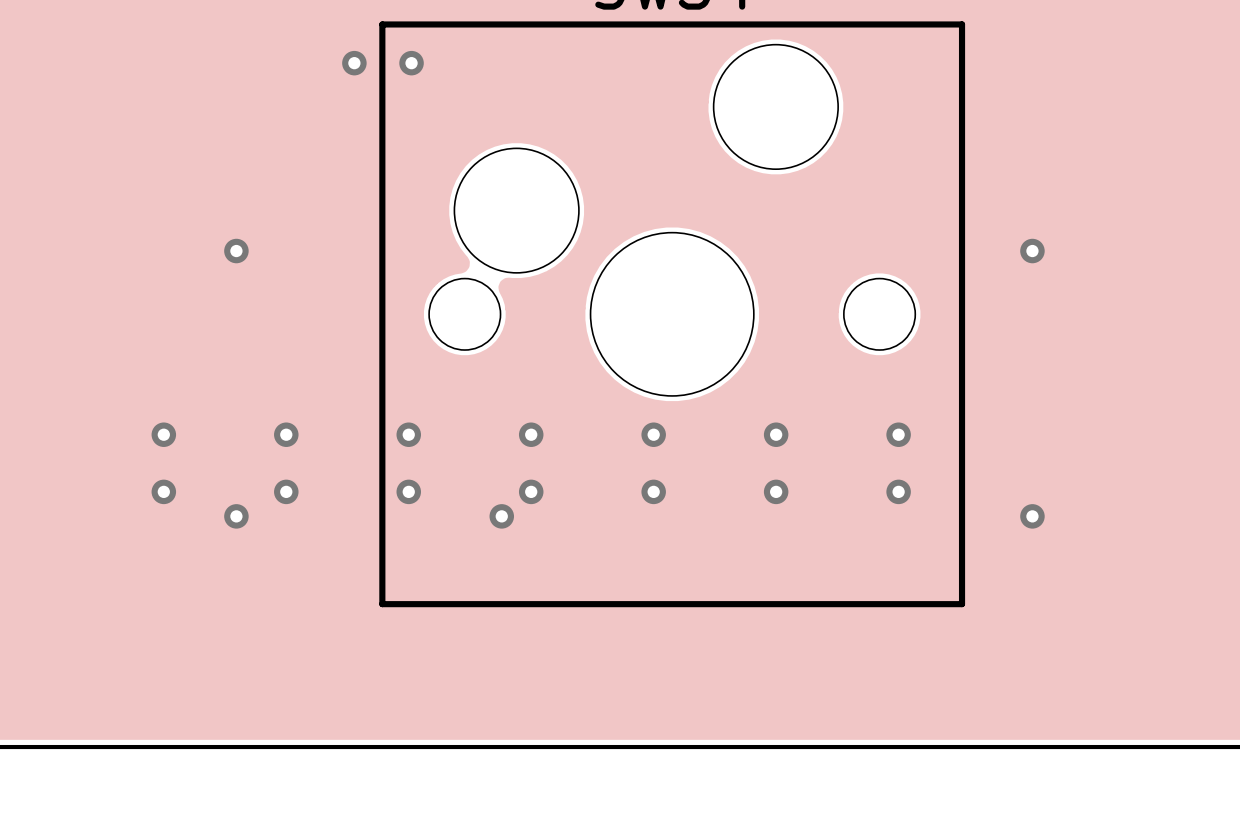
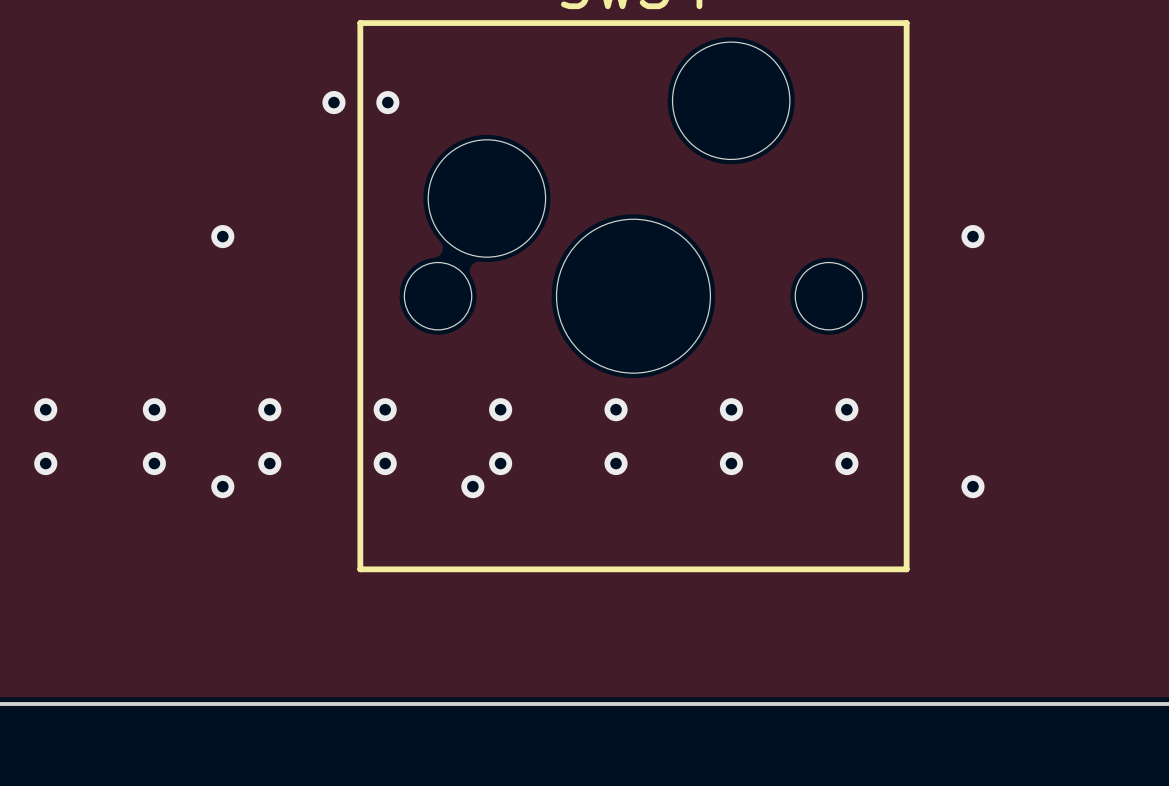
via: (354, 63) -> none
via: (411, 63) -> none
via: none -> (333, 102)
via: none -> (387, 102)
via: none -> (45, 409)
via: none -> (45, 463)

